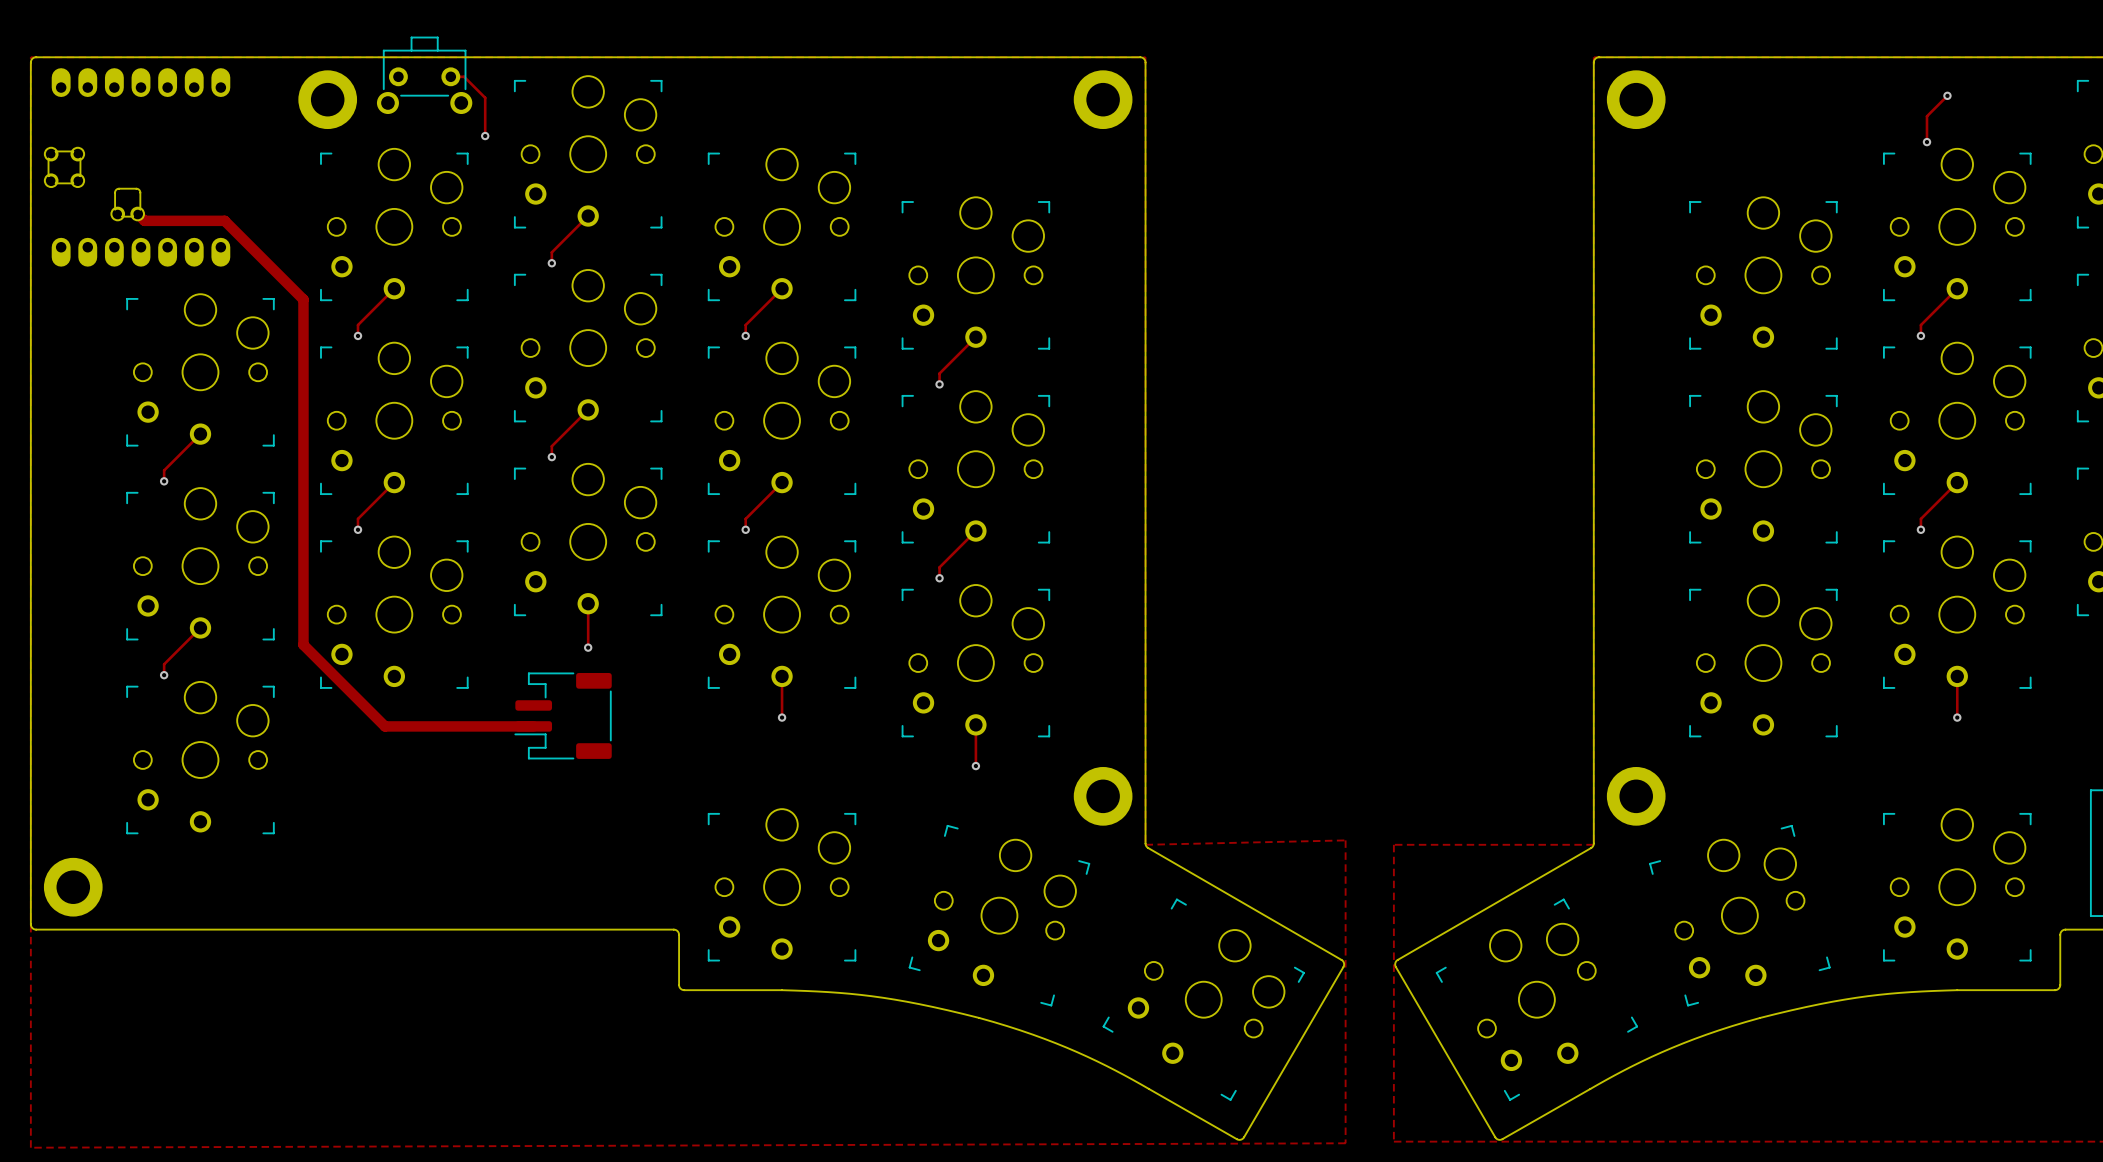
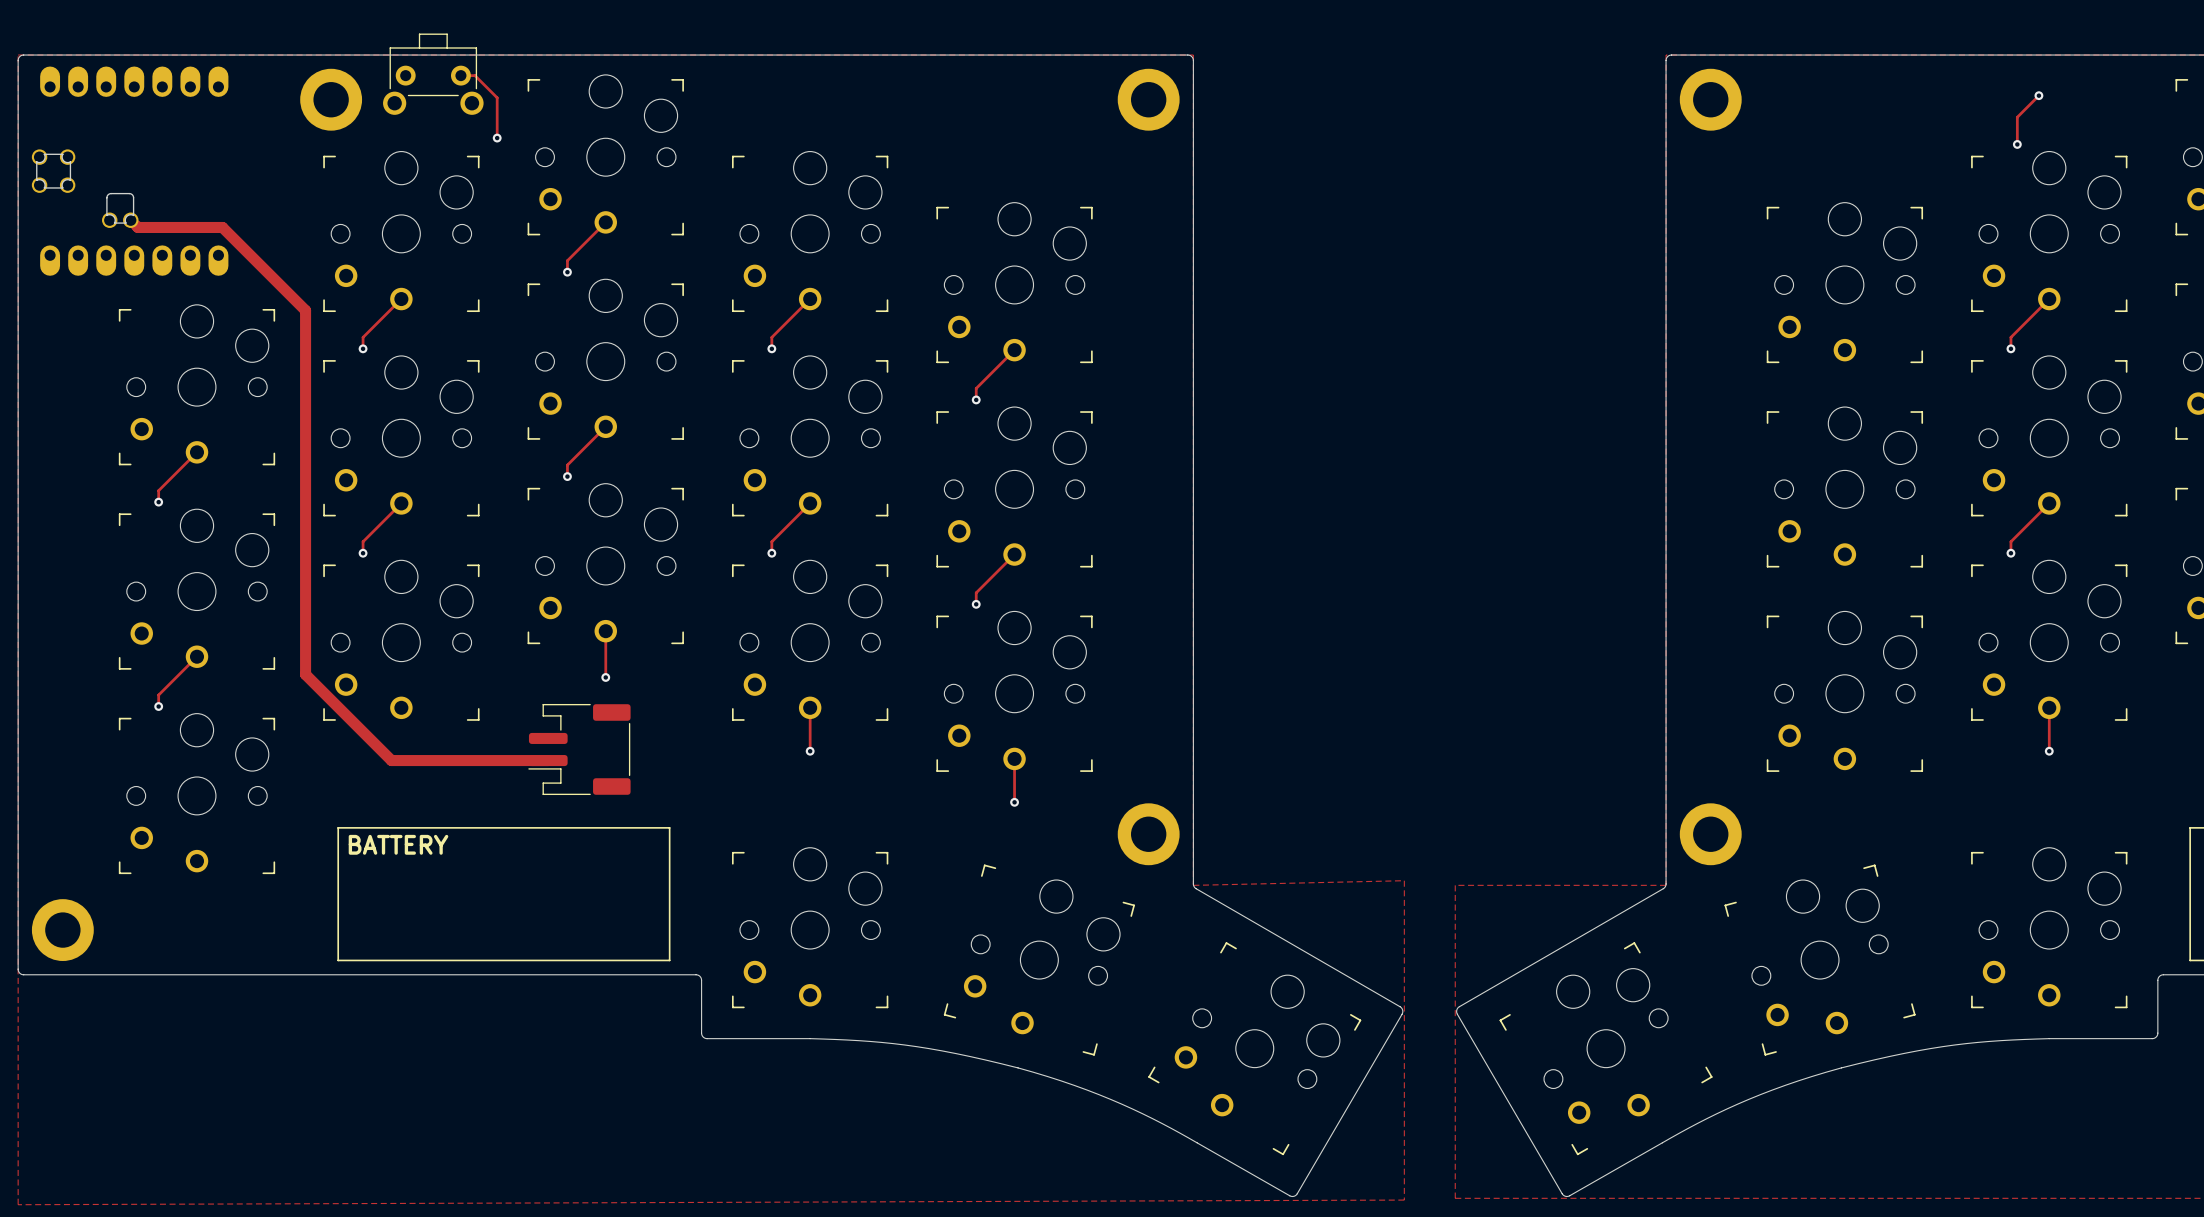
line: none -> (338, 827) (669, 827) (669, 960) (338, 960) (338, 827)
text: none -> BATTERY (398, 844)

